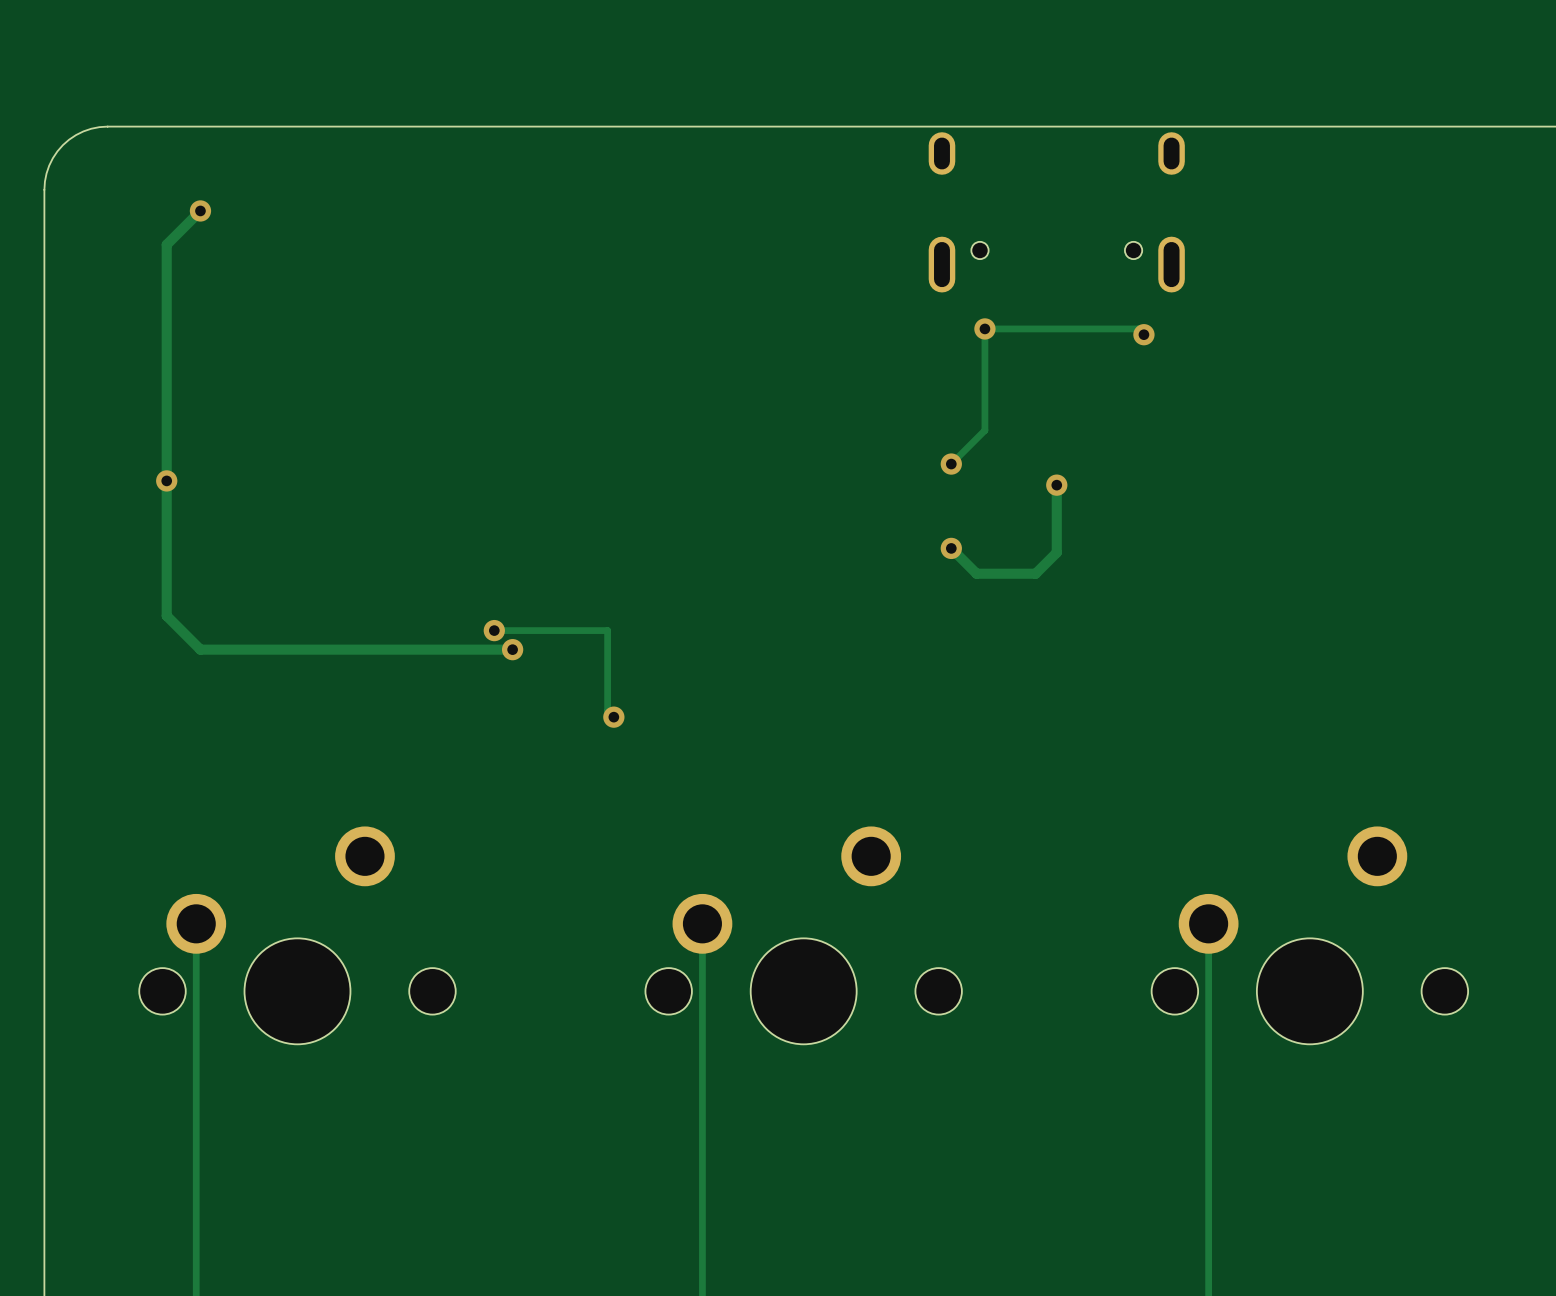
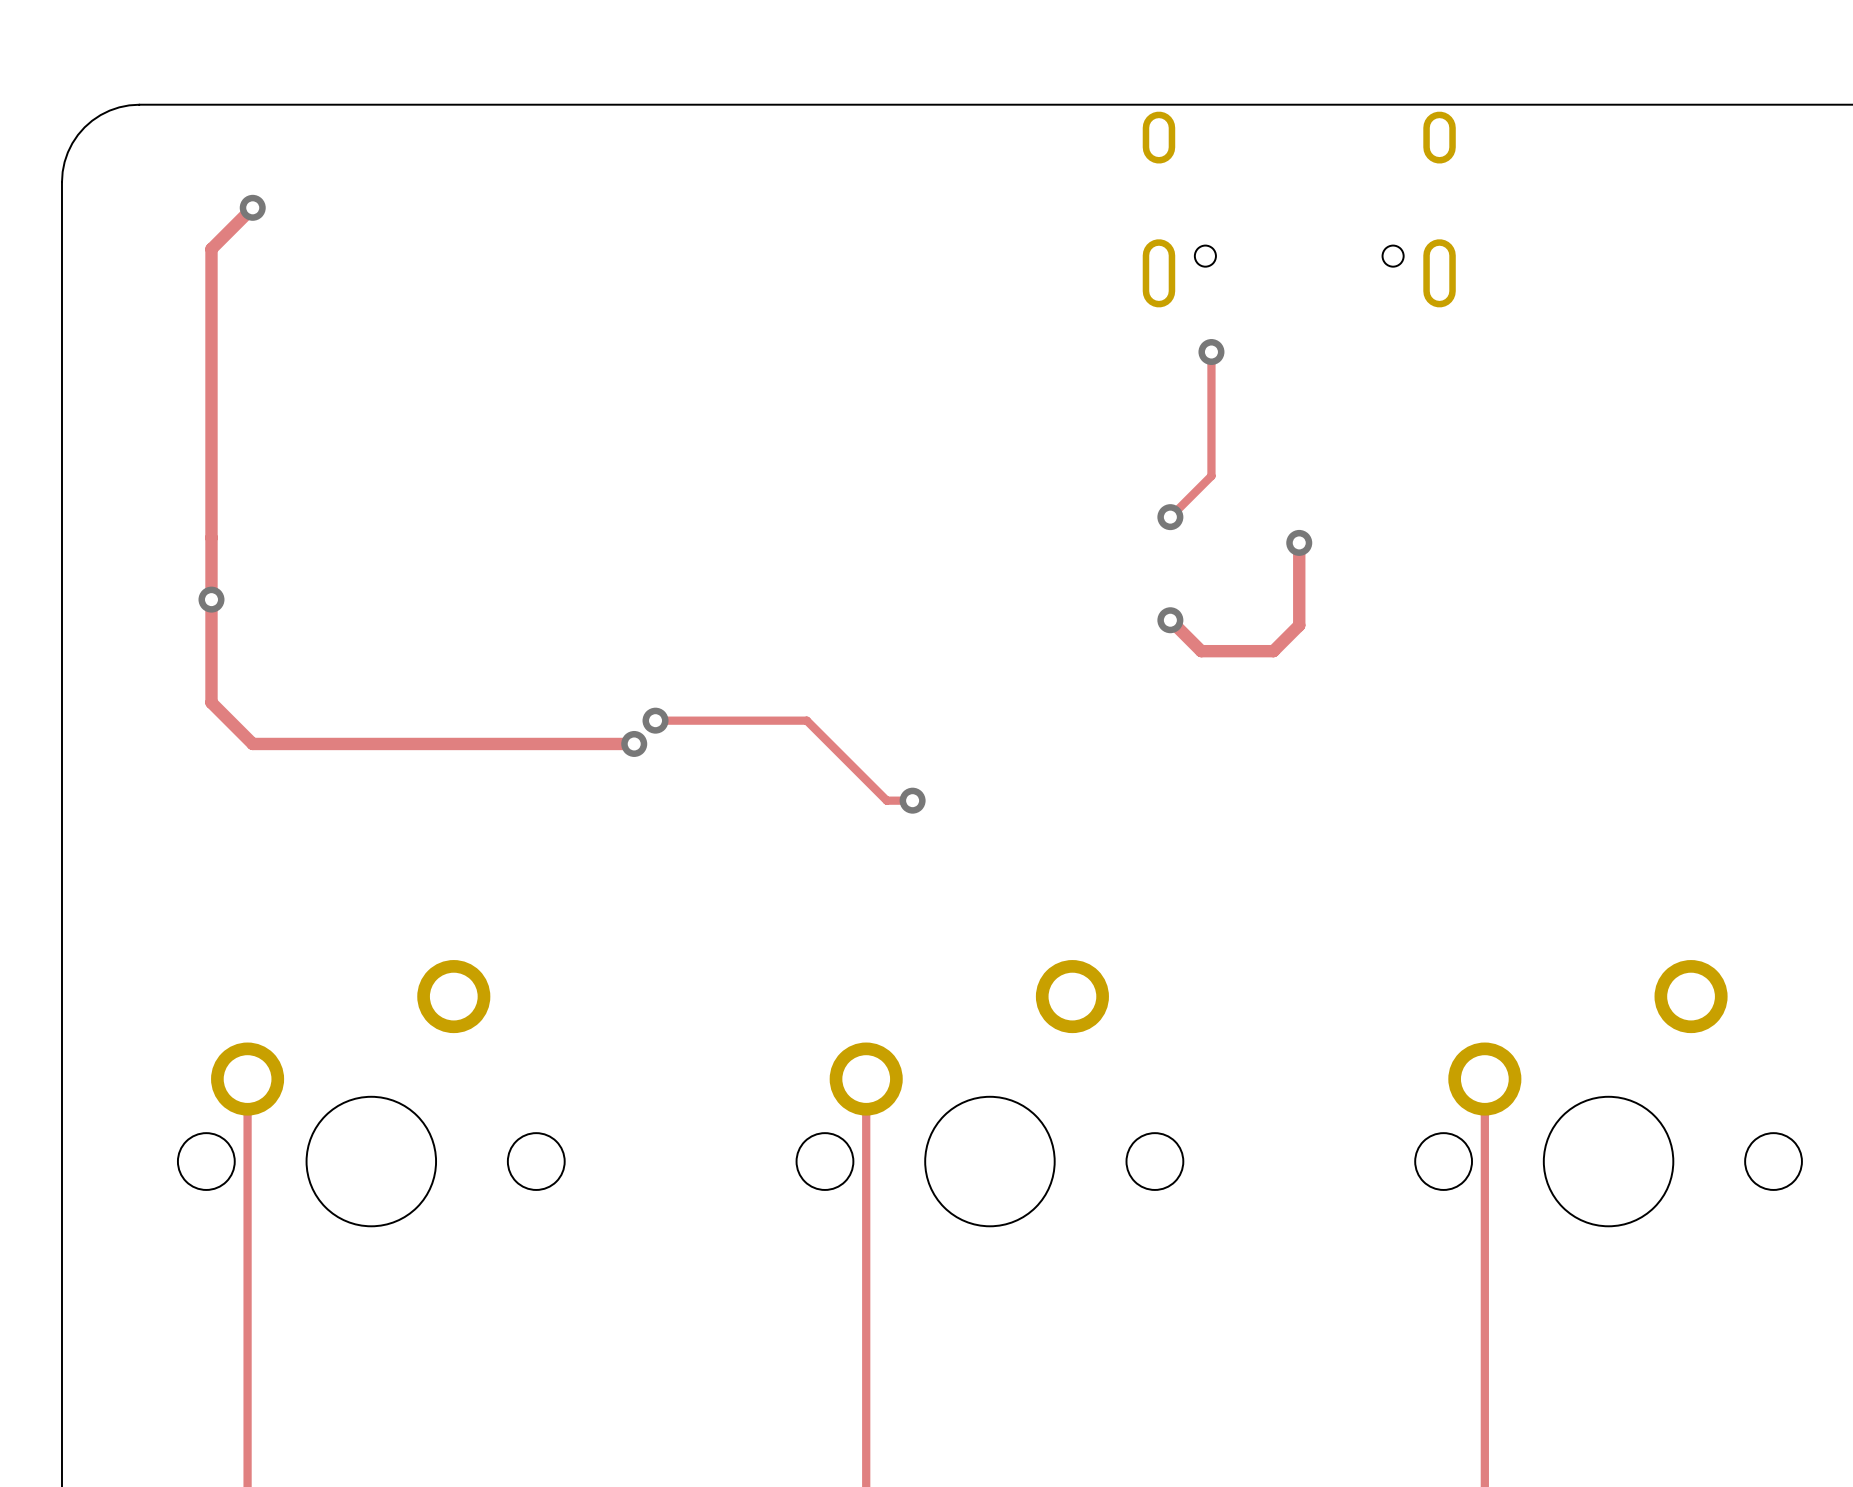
track: (984, 328) (1138, 328) (1143, 334) -> none
via: (1143, 334) -> none
via position: (166, 480) -> (211, 599)
track: (494, 630) (530, 630) -> none
via position: (494, 630) -> (655, 720)
track: (607, 630) (607, 710) (613, 717) -> (750, 720) (806, 720) (886, 800) (912, 800)
via: none -> (912, 800)
via: (613, 717) -> none

